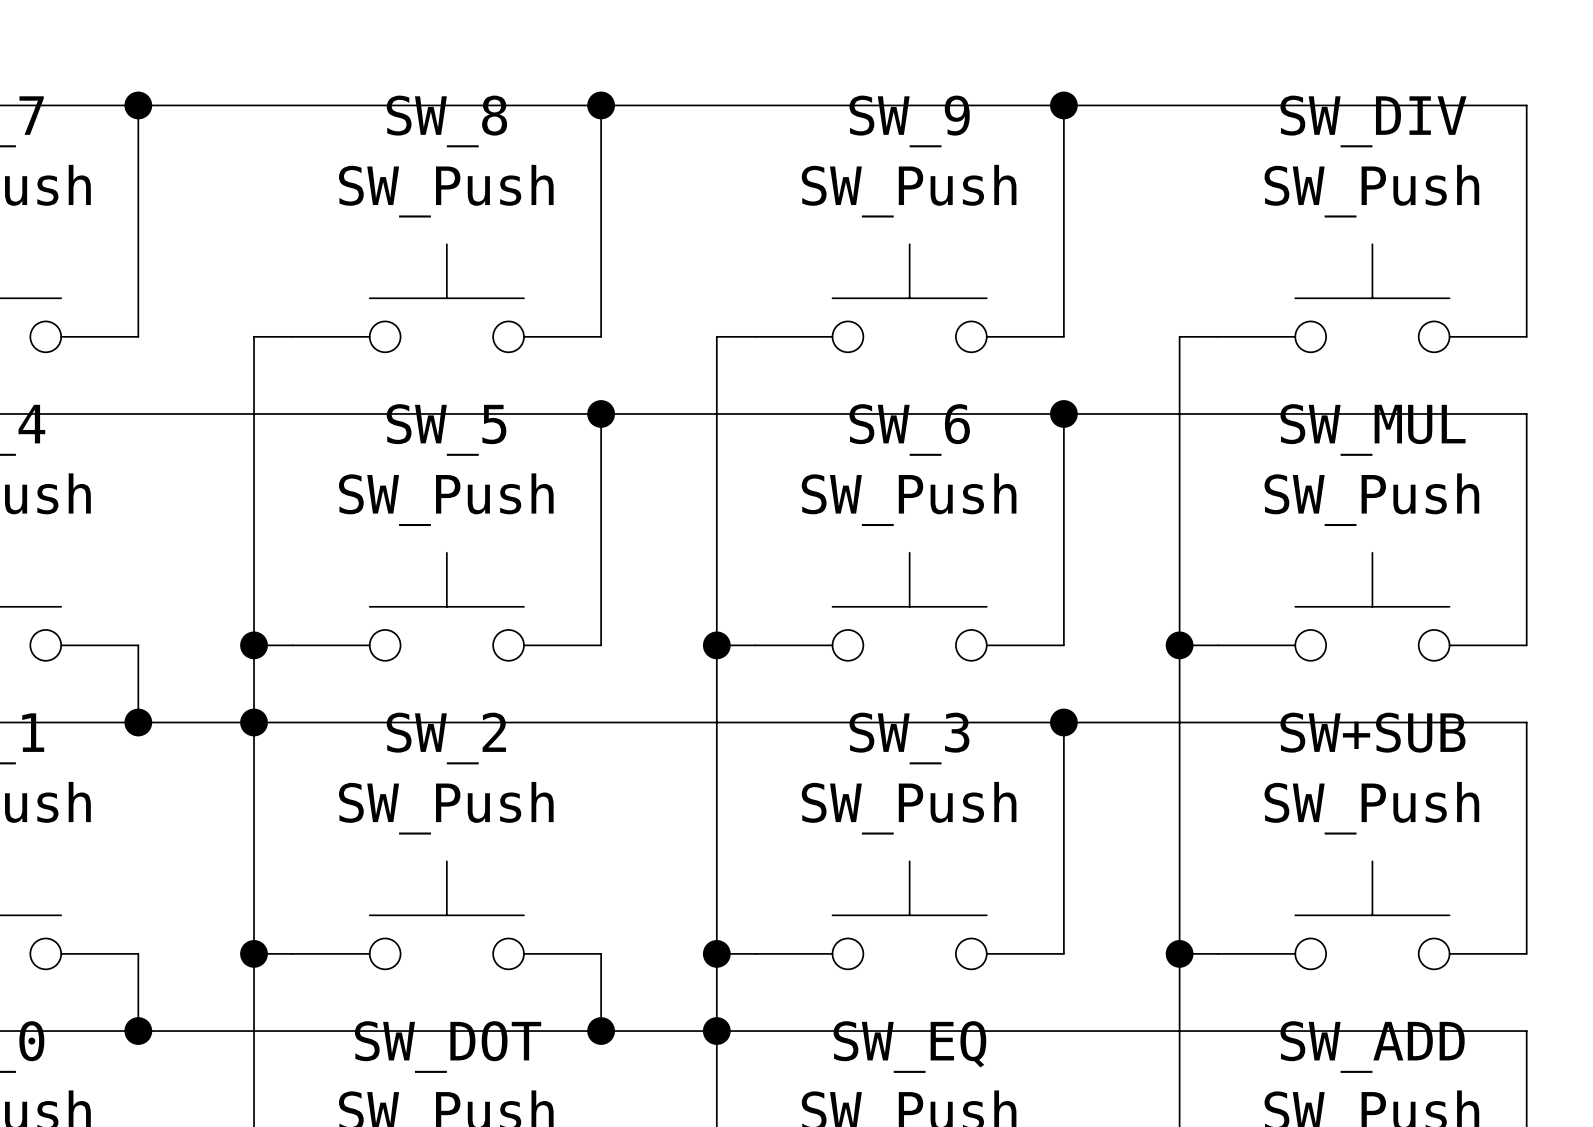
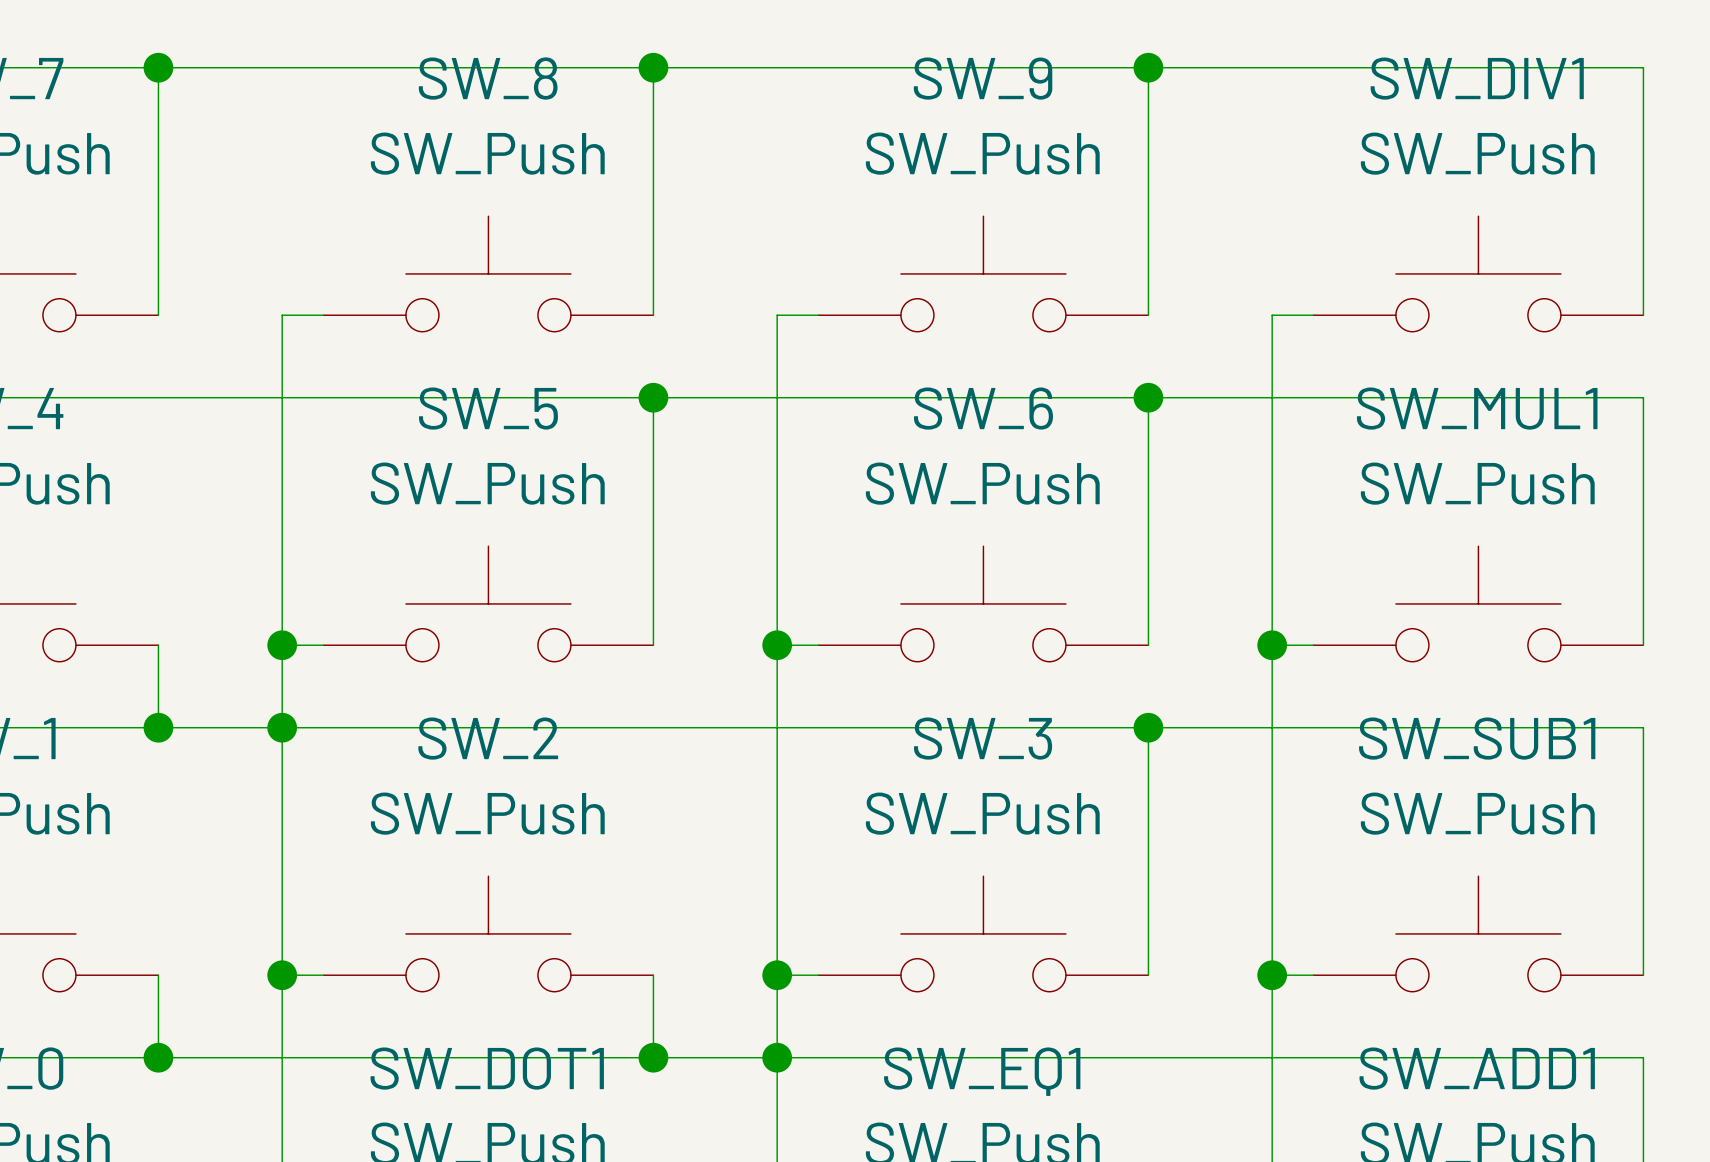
SW_DIV name: SW_DIV (1373, 121) -> SW_DIV1 (1477, 78)
SW_MUL name: SW_MUL (1373, 429) -> SW_MUL1 (1477, 408)
SW+SUB name: SW+SUB (1372, 732) -> SW_SUB1 (1477, 738)
SW_DOT name: SW_DOT (448, 1047) -> SW_DOT1 (487, 1068)
SW_EQ name: SW_EQ (909, 1047) -> SW_EQ1 (982, 1071)
SW_ADD name: SW_ADD (1372, 1047) -> SW_ADD1 (1477, 1068)

